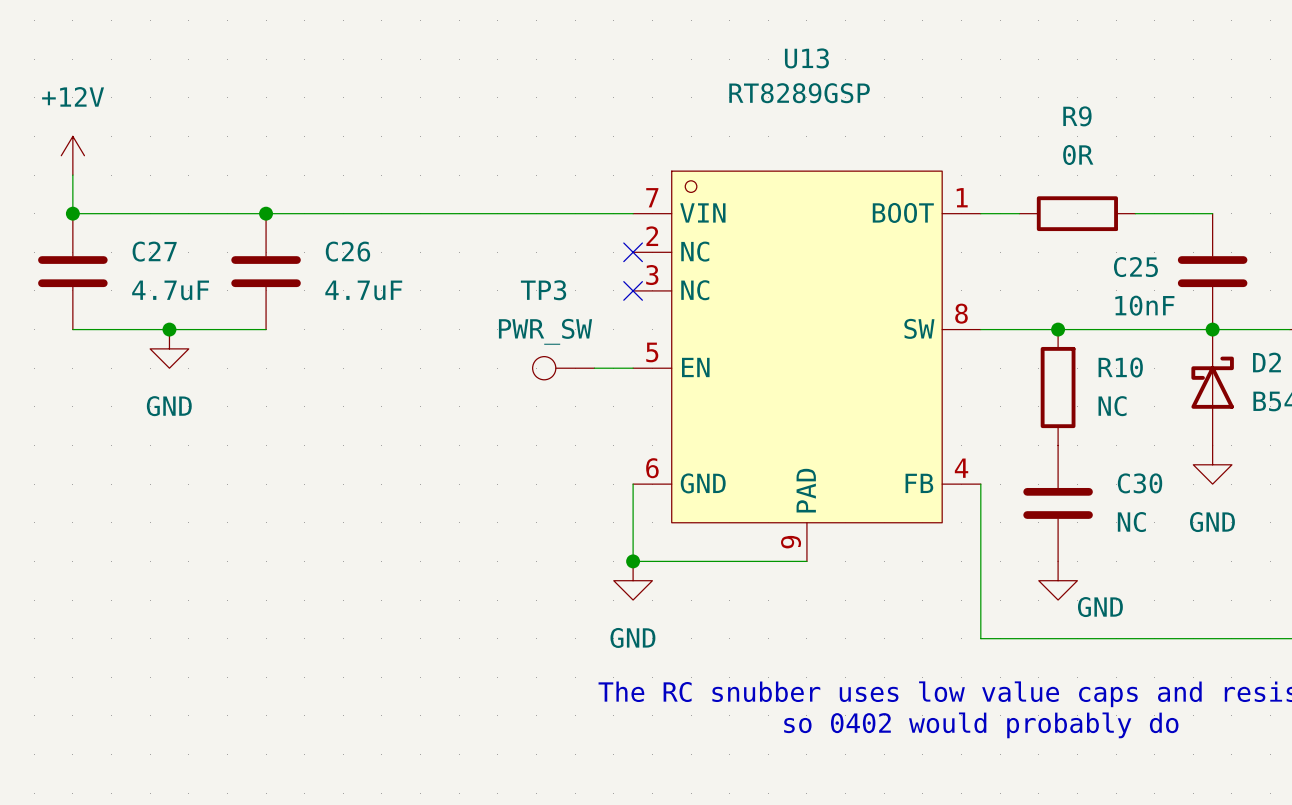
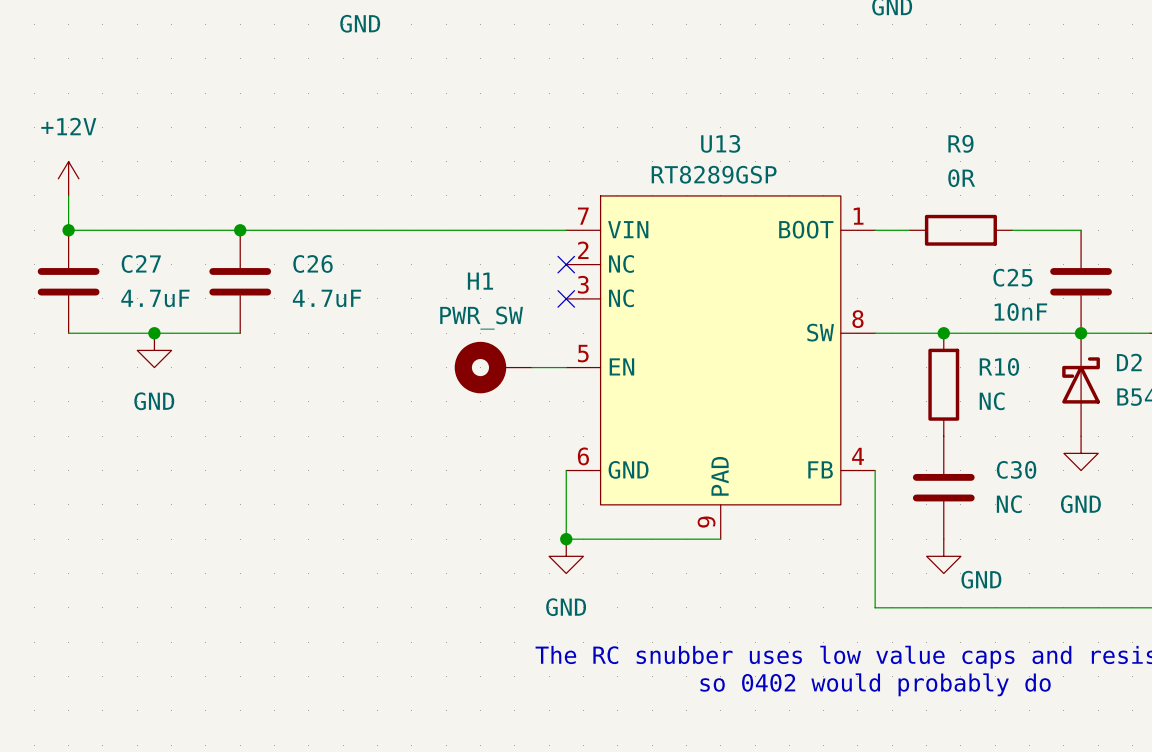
U13 name position: U13 (806, 58) -> U13 (720, 143)
U13 value position: RT8289GSP (799, 93) -> RT8289GSP (714, 174)
U13 symbol: [633, 171, 981, 562] -> [566, 195, 876, 540]
H1: none -> PWR_SW (493, 367)
TP3: PWR_SW (563, 368) -> none

